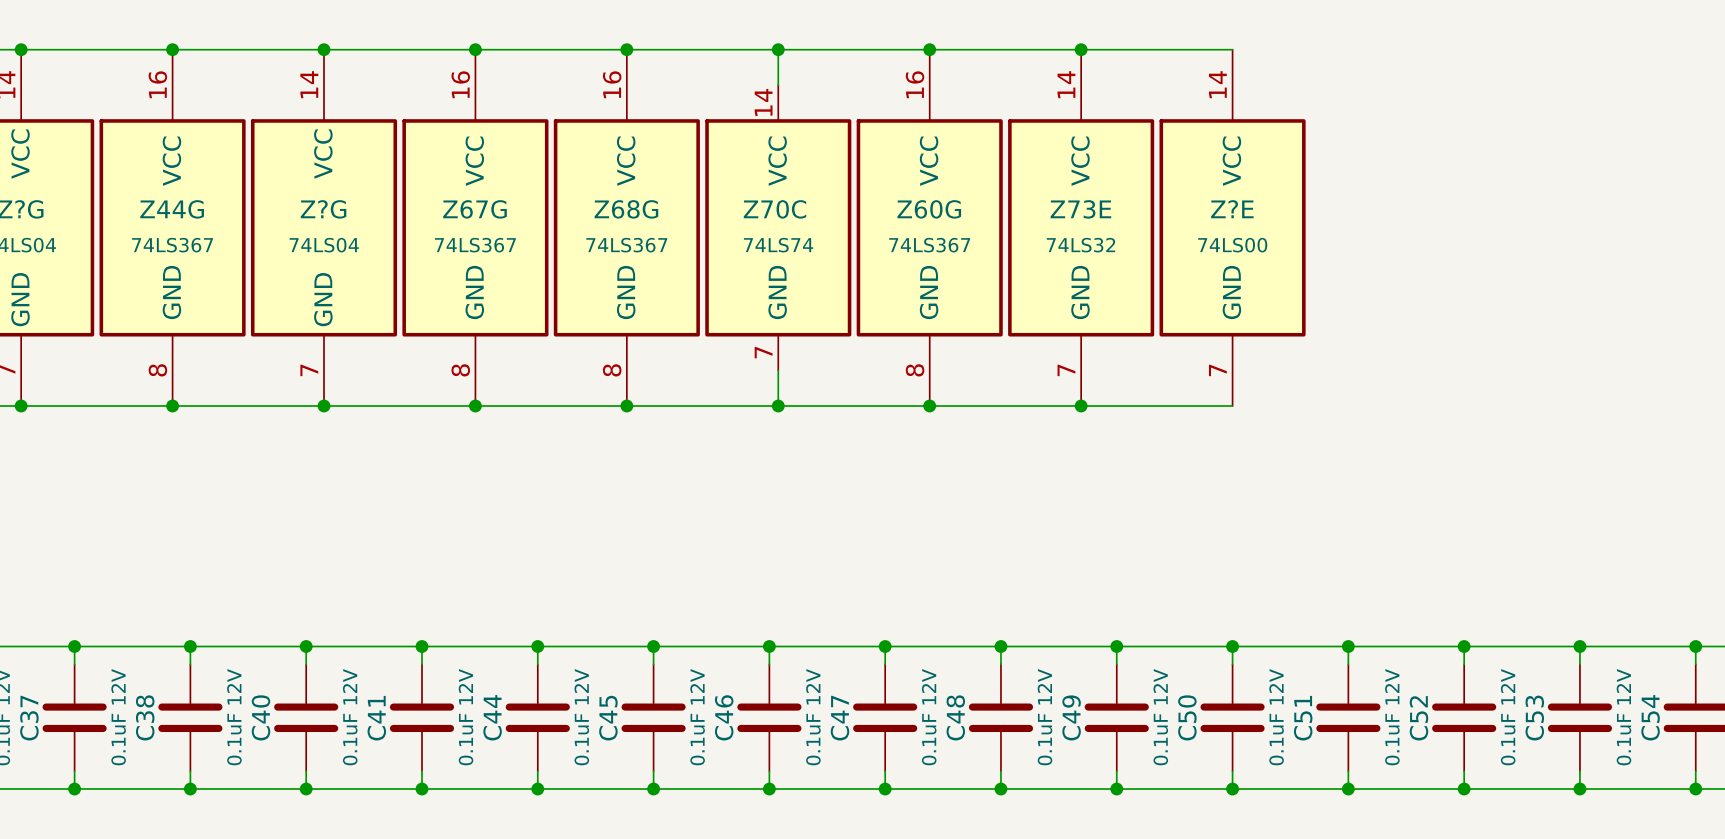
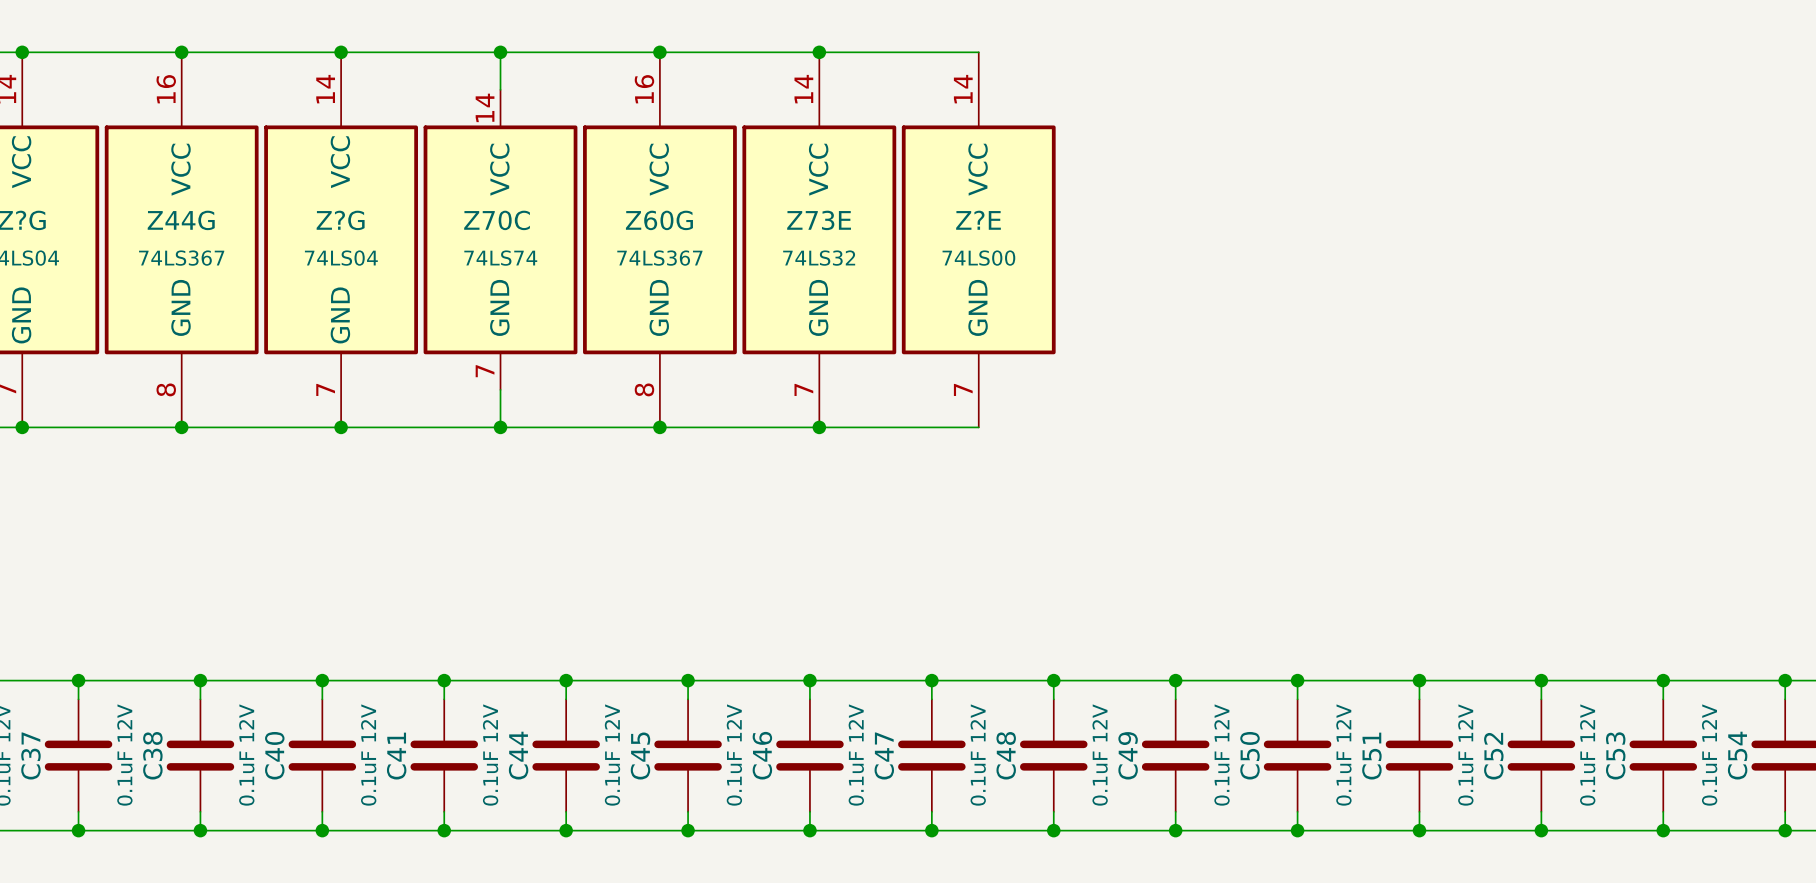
wire: (929, 49) (1232, 49) -> none
junction: (929, 49) -> none
junction: (1081, 49) -> none
Z60G pin number: 16 (915, 84) -> 14 (963, 89)
Z68G name: Z68G (626, 209) -> Z60G (659, 220)
Z60G name: Z60G (929, 209) -> Z?E (978, 220)
Z67G: 74LS367 (475, 227) -> none
Z70C position: (778, 227) -> (500, 239)
Z73E position: (1081, 227) -> (819, 239)
Z?E: 74LS00 (1232, 227) -> none
Z60G value: 74LS367 (929, 245) -> 74LS00 (978, 258)
Z60G pin number: 8 (915, 370) -> 7 (963, 389)
wire: (929, 406) (1232, 406) -> none
junction: (929, 406) -> none
junction: (1081, 406) -> none

